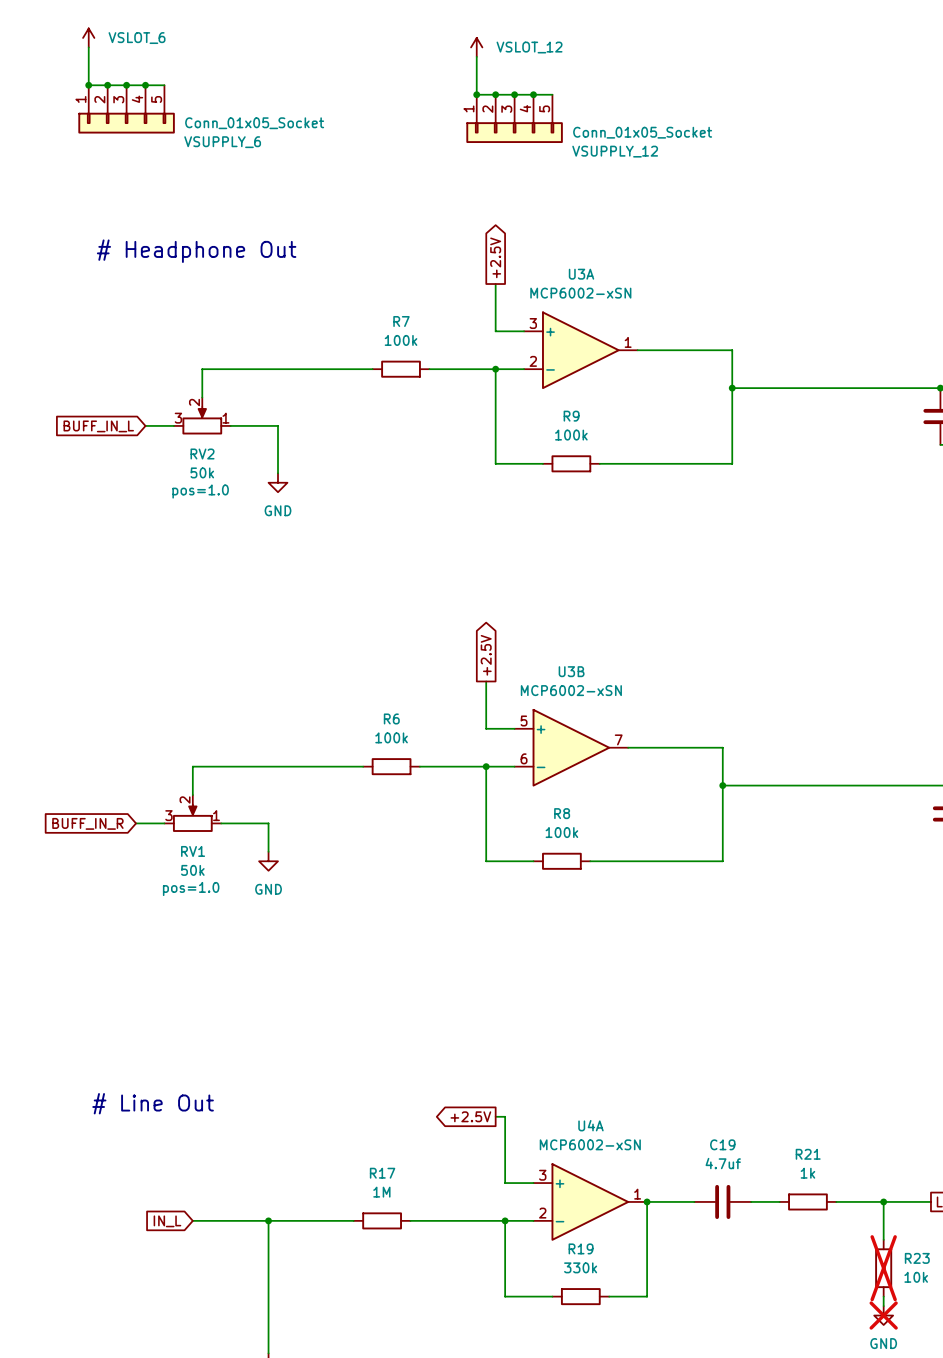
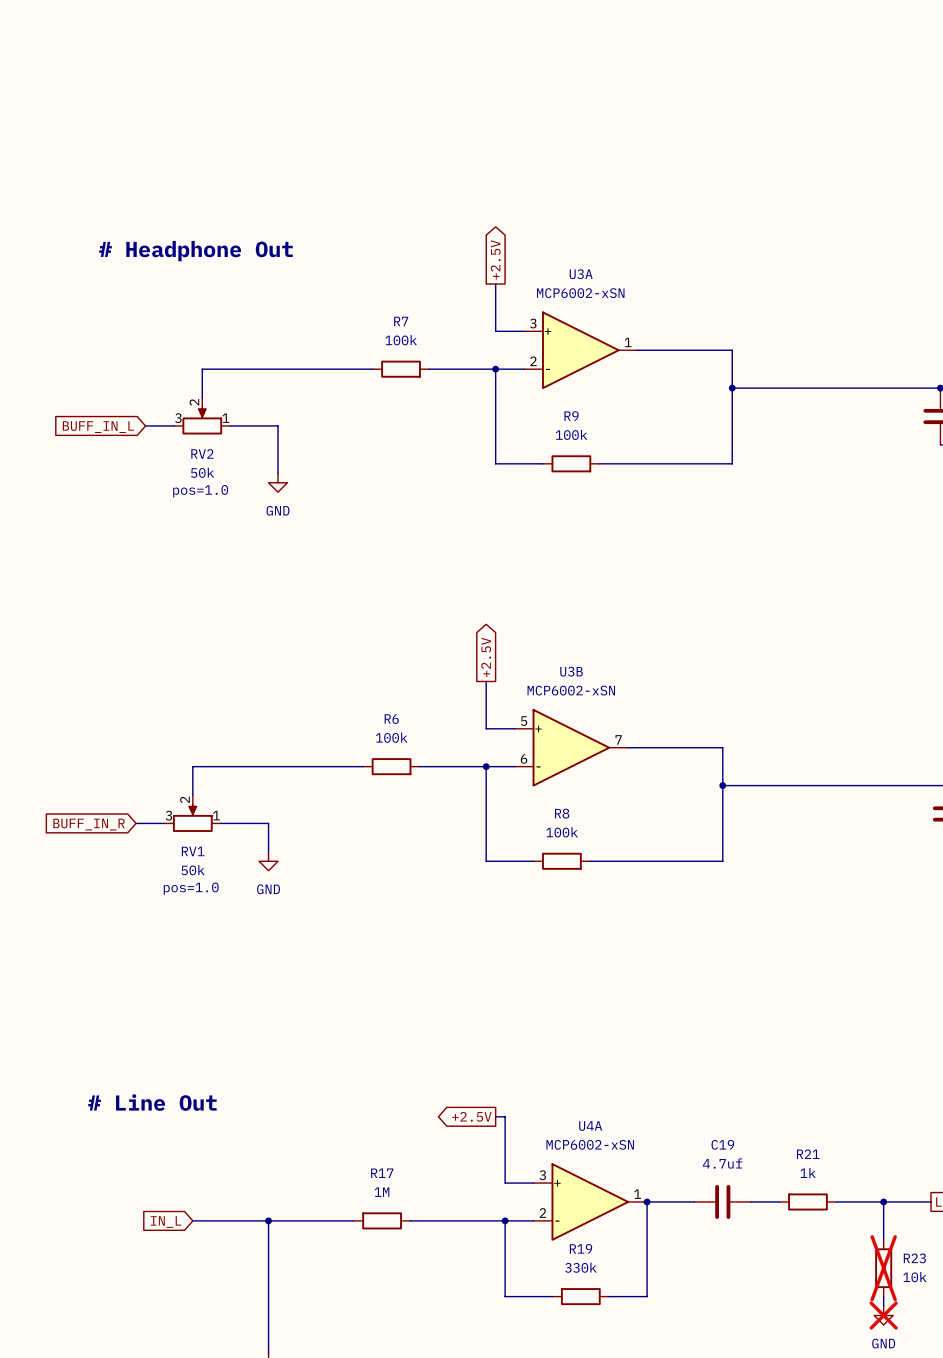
power symbol: VSLOT_6 (88, 37) -> none
wire: (88, 47) (88, 85) (164, 85) -> none
power symbol: VSLOT_12 (476, 47) -> none
wire: (476, 56) (476, 94) (552, 94) -> none
junction: (88, 85) -> none
junction: (107, 85) -> none
junction: (126, 85) -> none
junction: (145, 85) -> none
junction: (476, 94) -> none
junction: (495, 94) -> none
junction: (514, 94) -> none
junction: (533, 94) -> none
VSUPPLY_6: Conn_01x05_Socket (126, 109) -> none
VSUPPLY_12: Conn_01x05_Socket (514, 118) -> none

